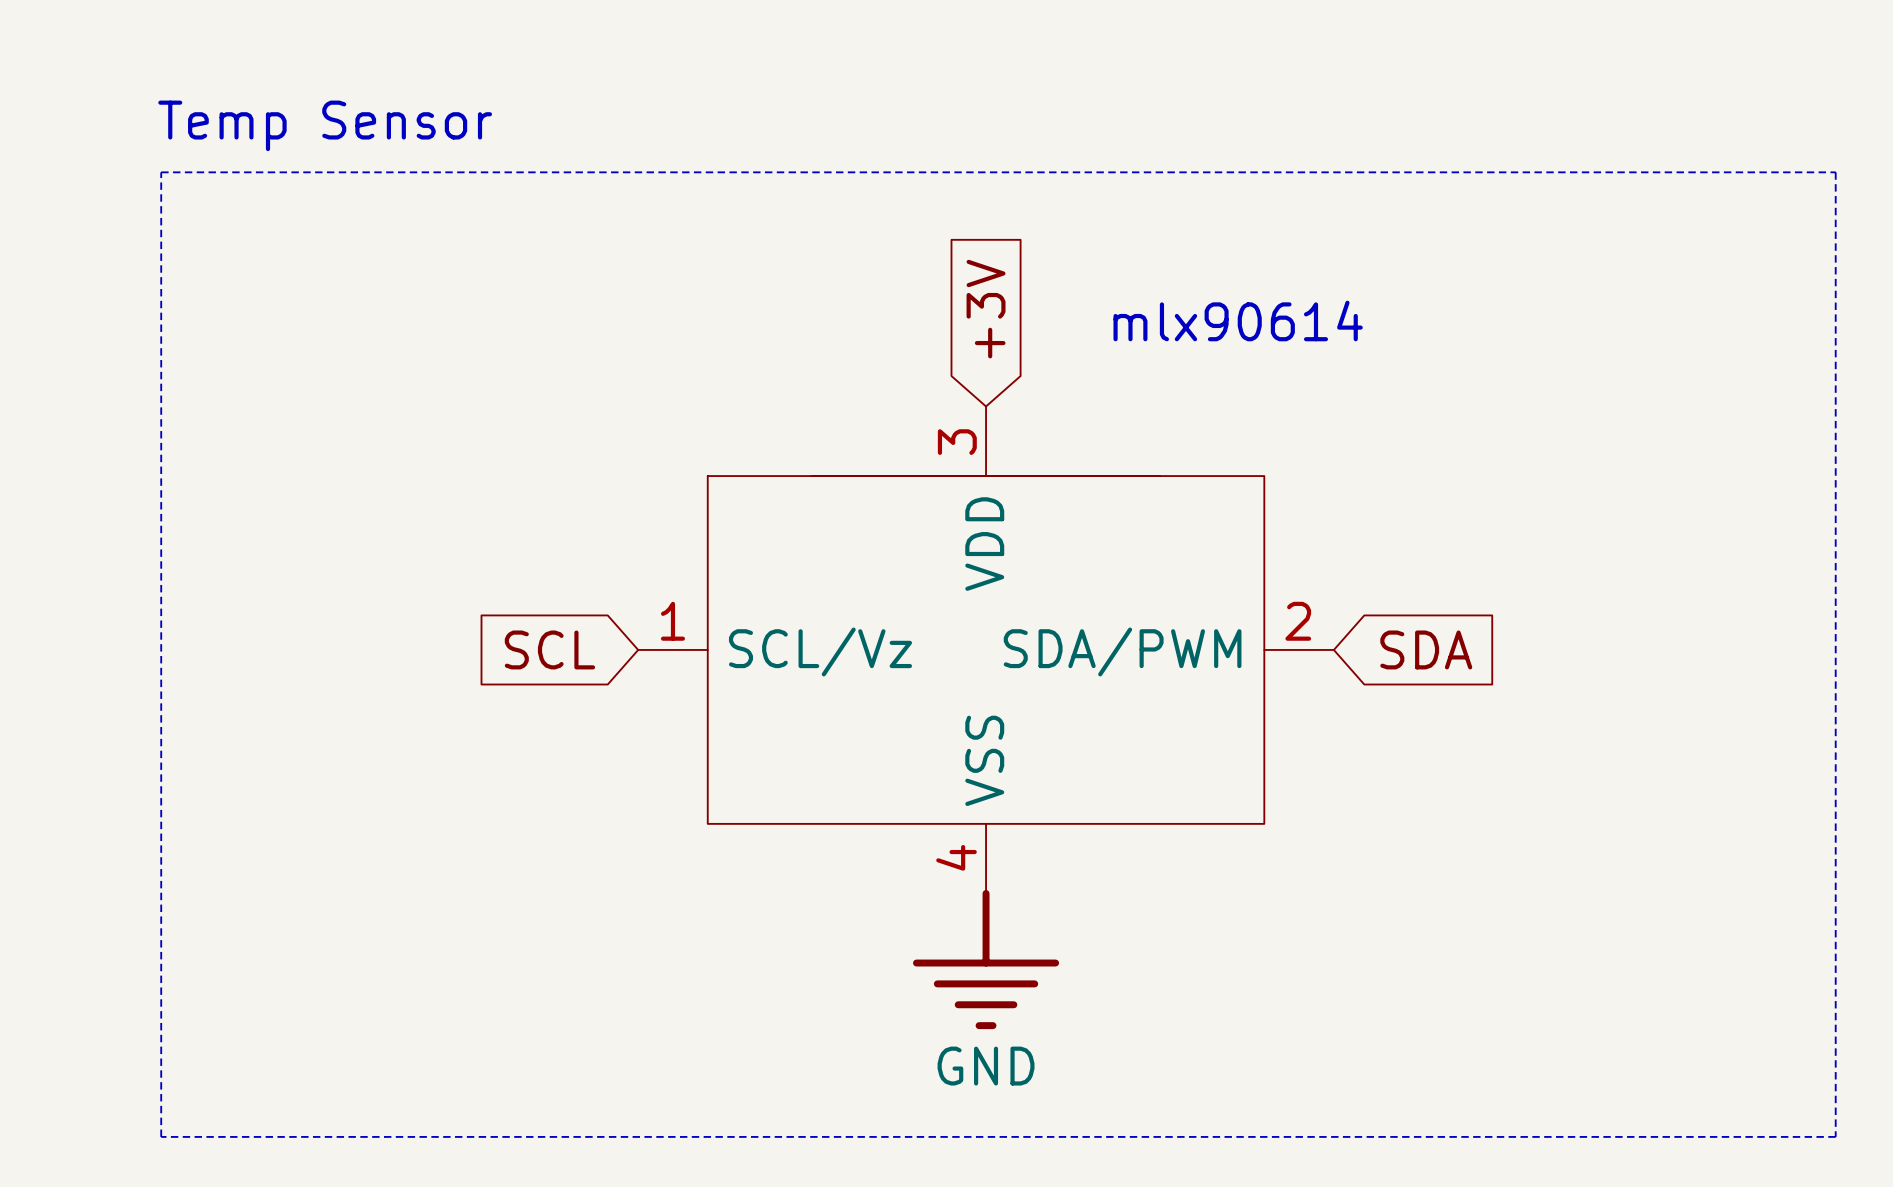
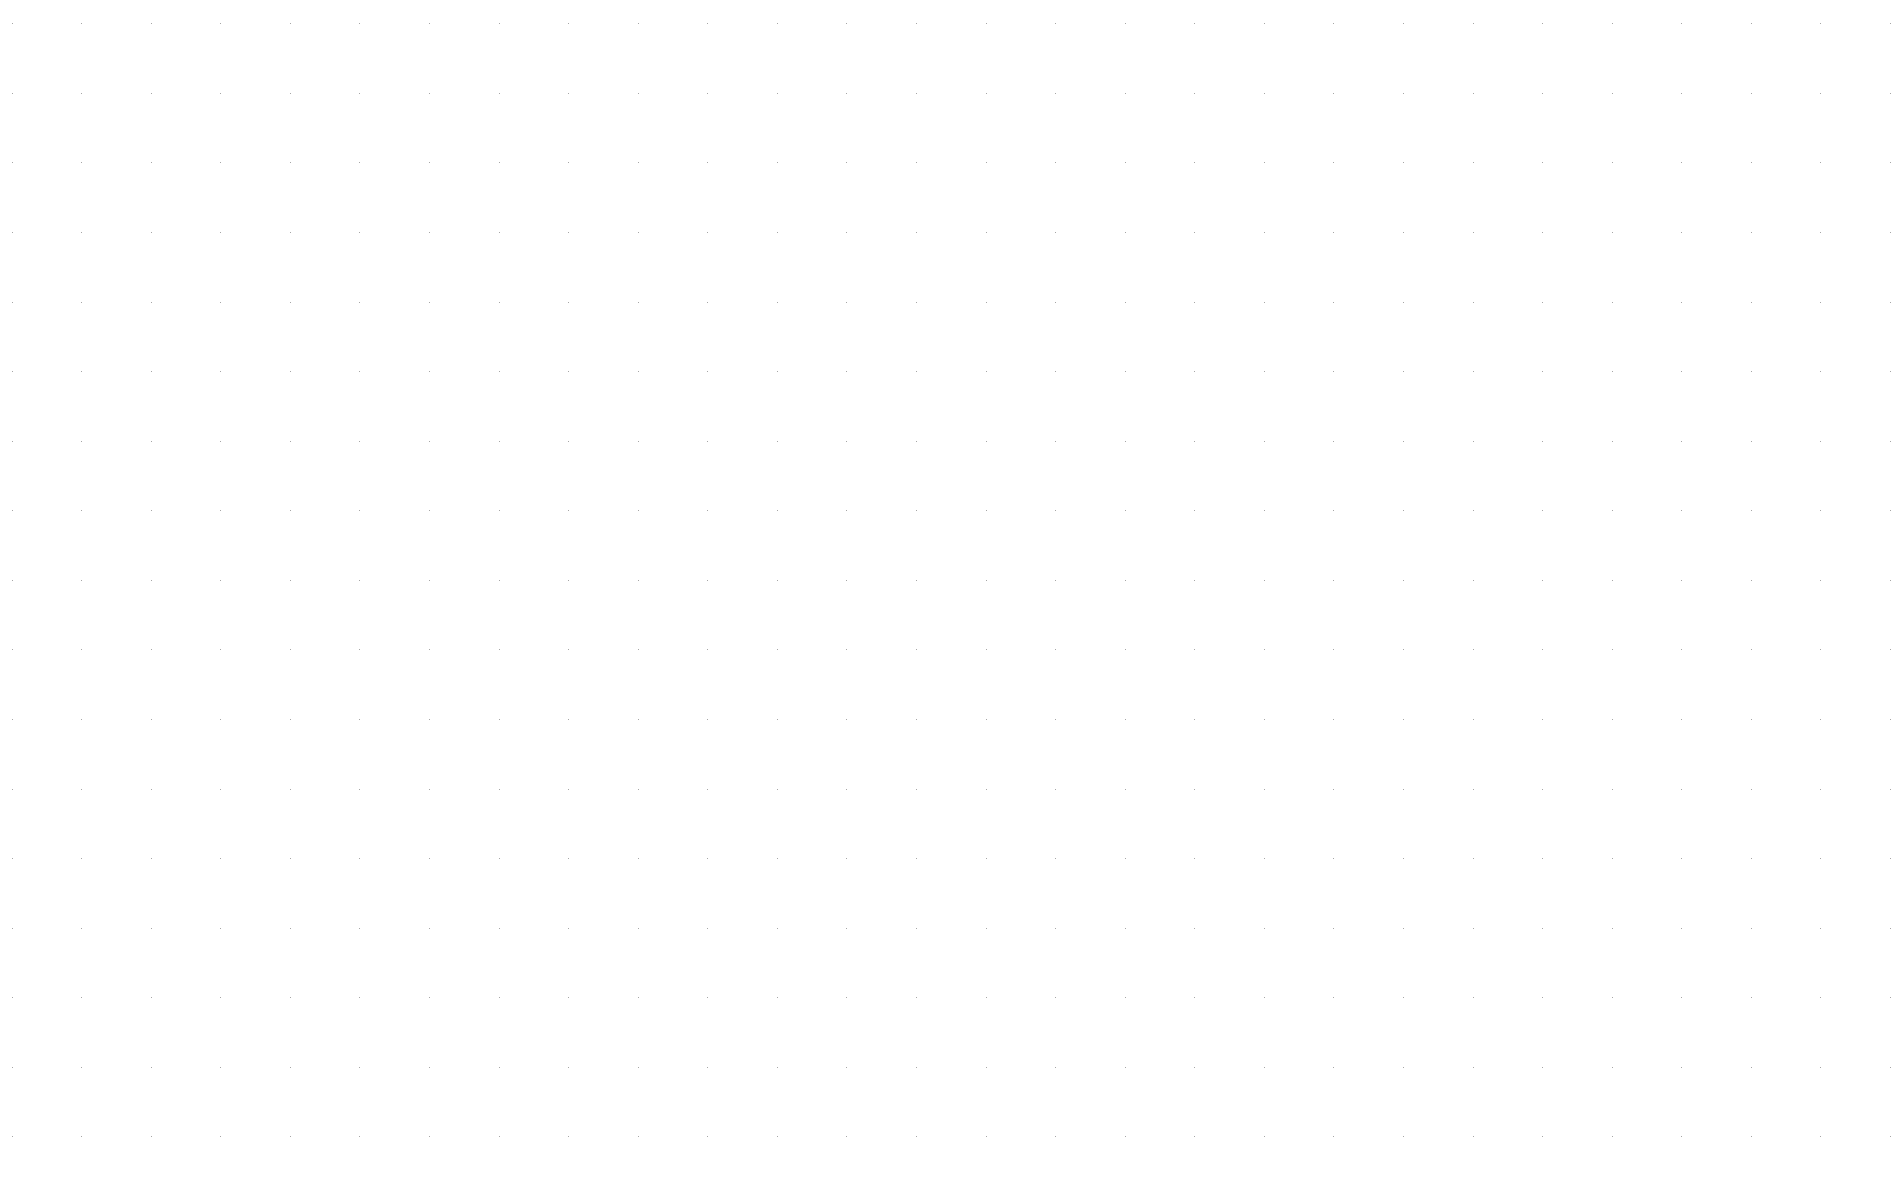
text: Temp Sensor (325, 125) -> none
line: (161, 172) (1835, 172) (1835, 1136) (161, 1136) (161, 172) -> none
global label: +3V (986, 309) -> none
text: mlx90614 (1238, 320) -> none
global label: SCL (549, 649) -> none
part: (986, 649) -> none
global label: SDA (1426, 649) -> none
power symbol: GND (986, 959) -> none

